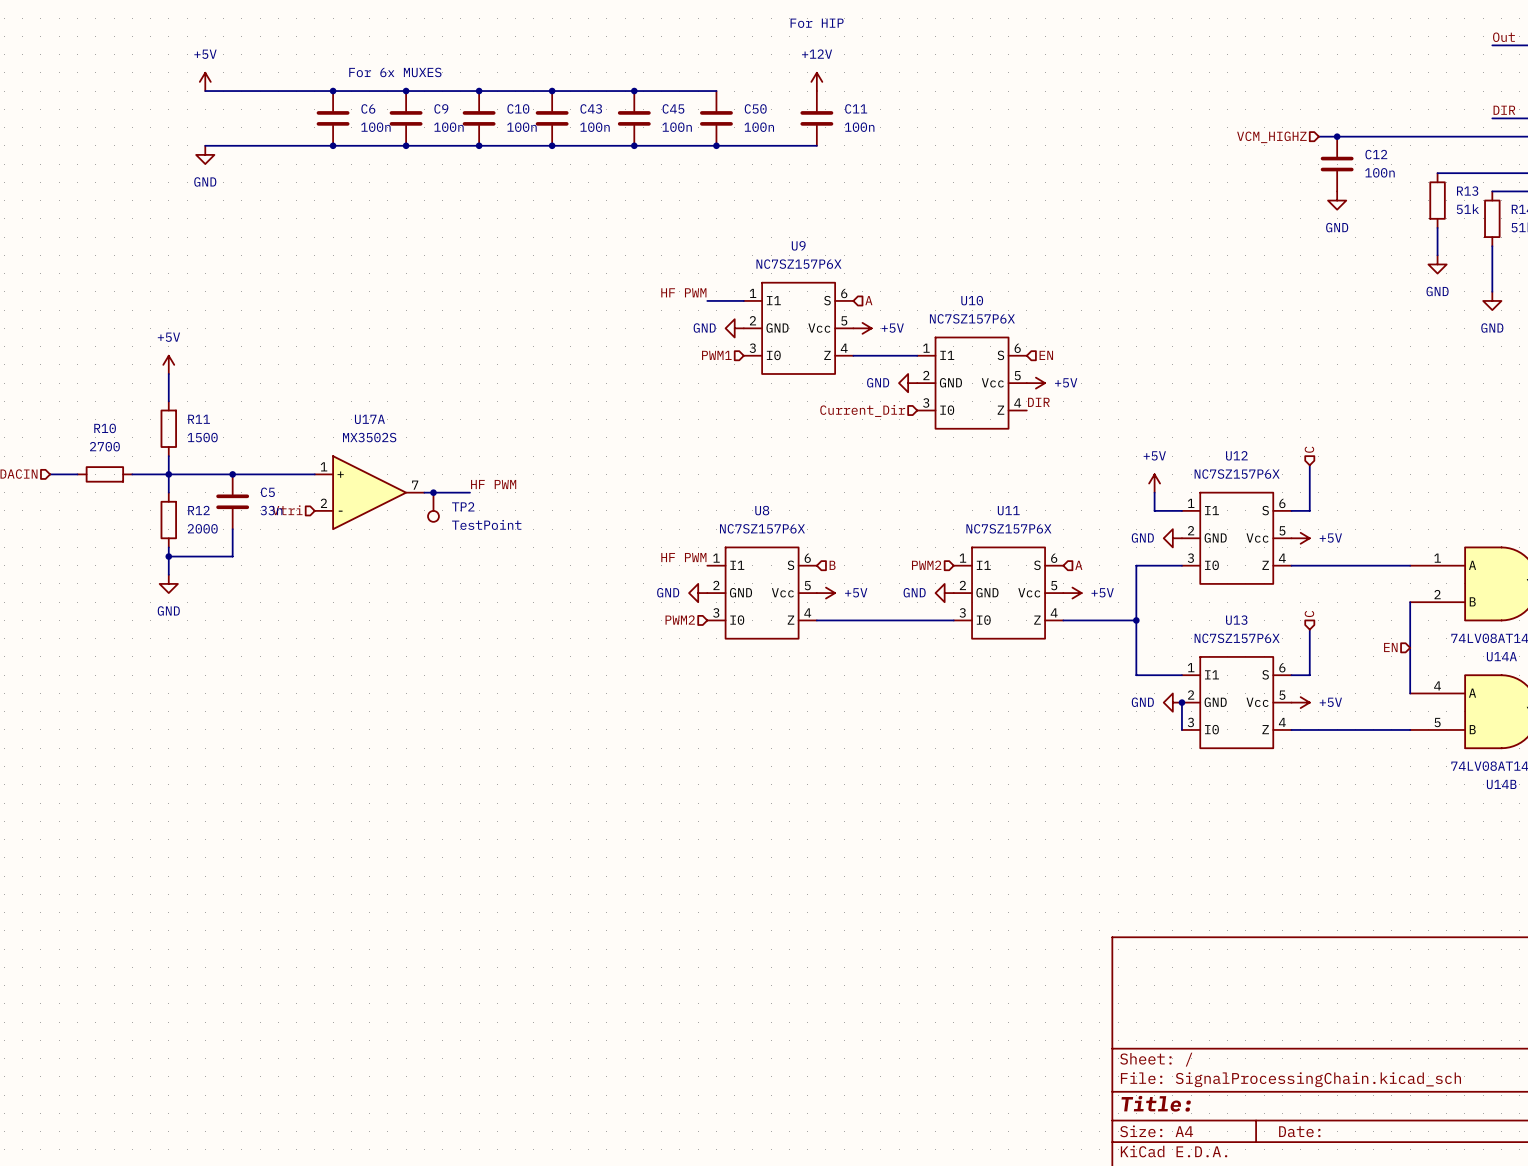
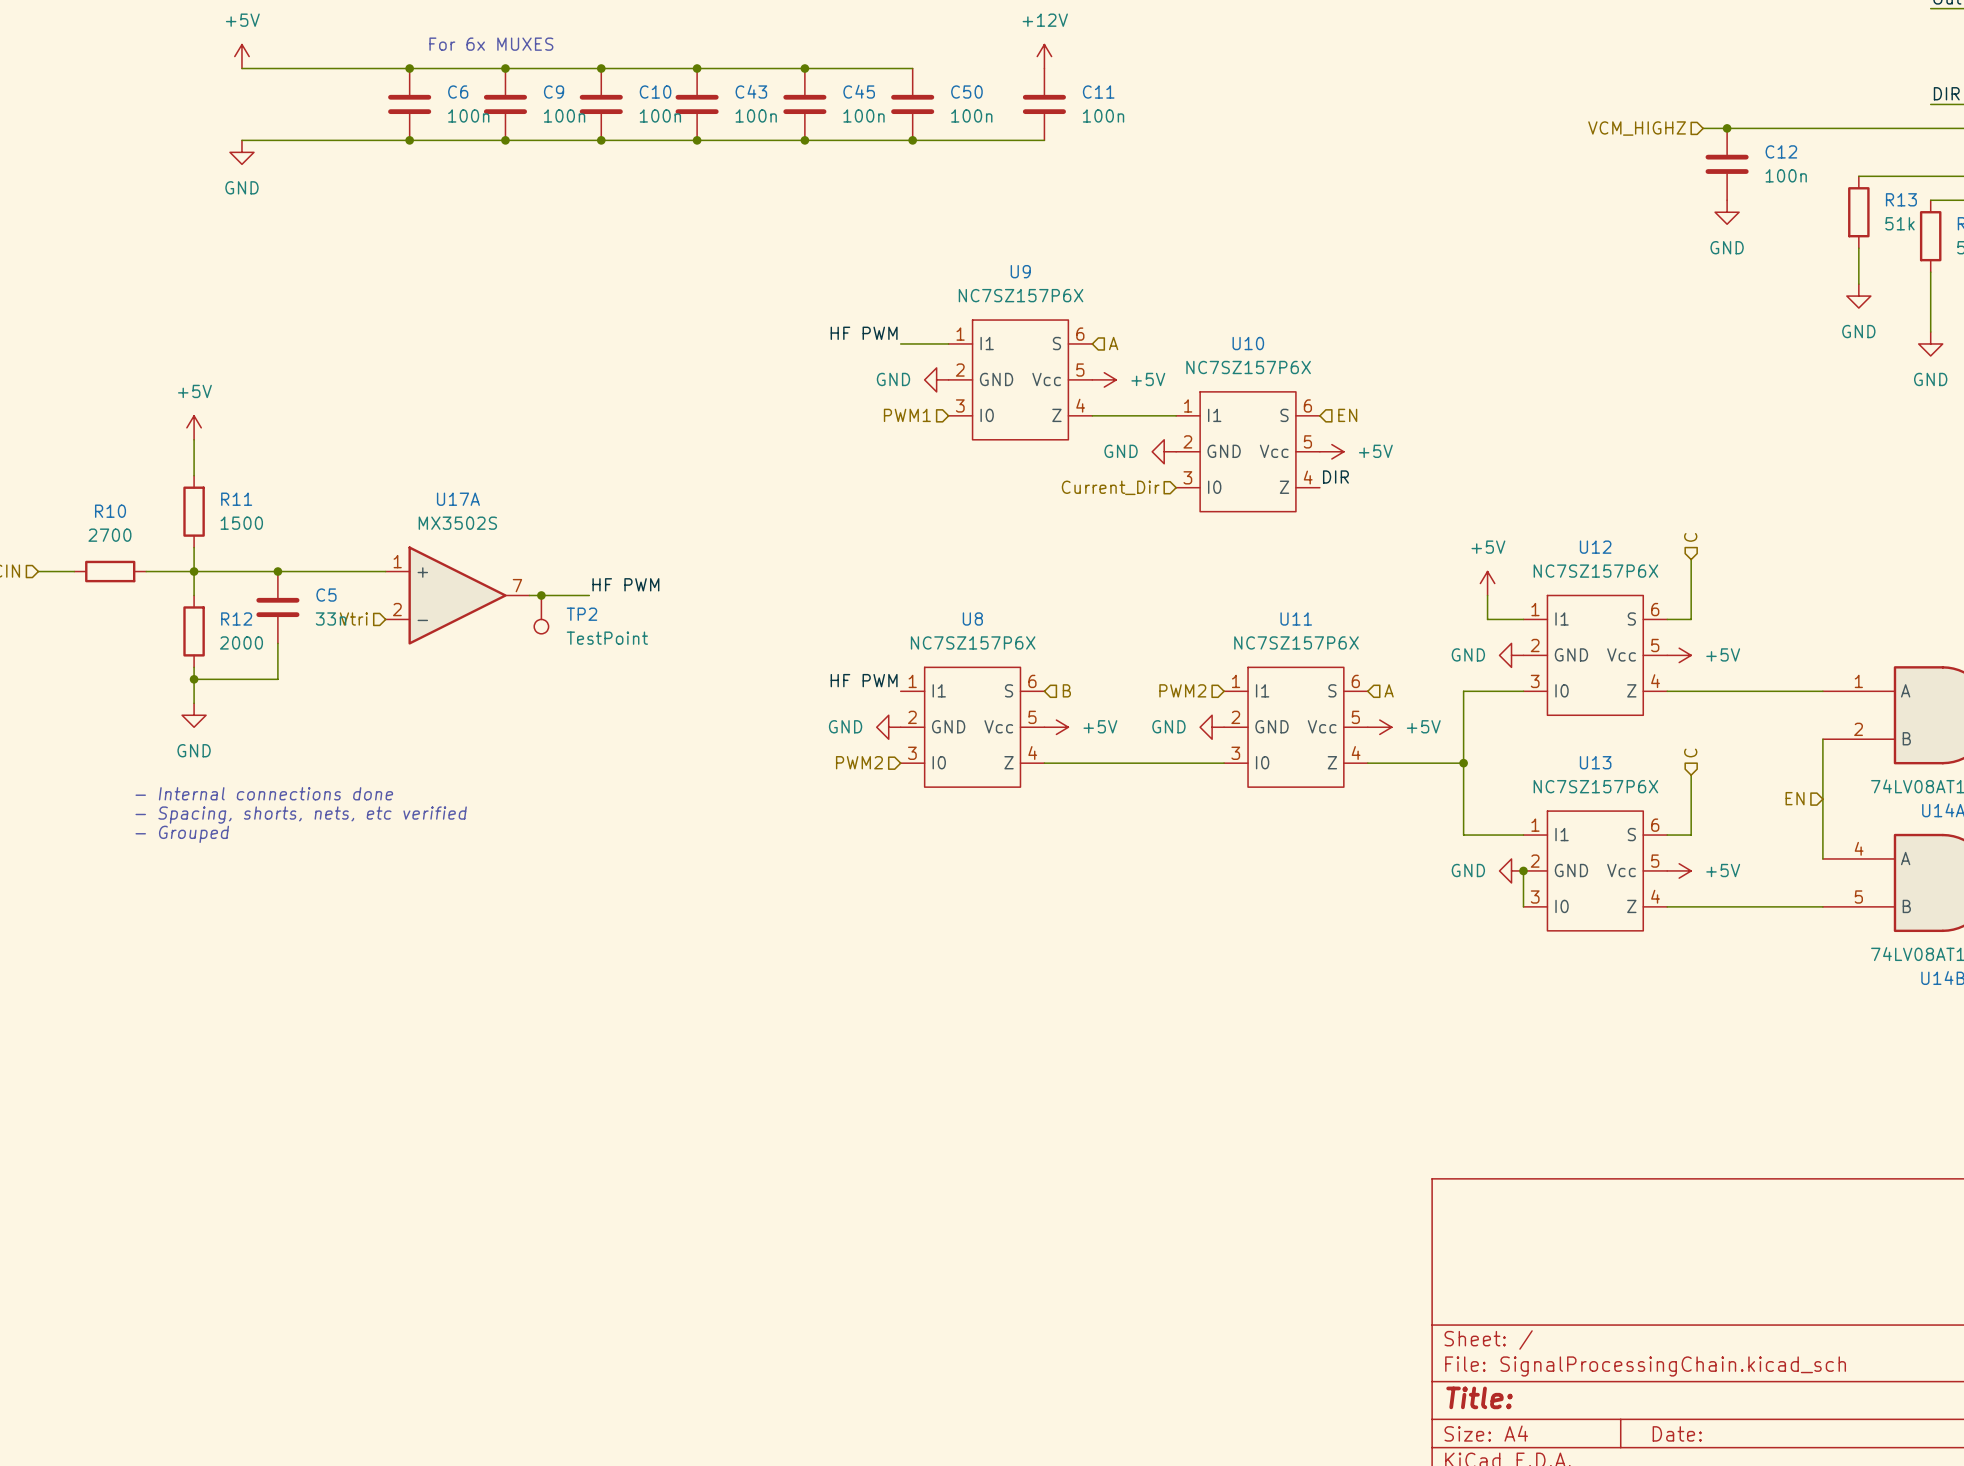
text: none -> - Internal connections done (264, 793)
text: none -> - Spacing, shorts, nets, etc verified (301, 815)
text: none -> - Grouped (182, 834)

